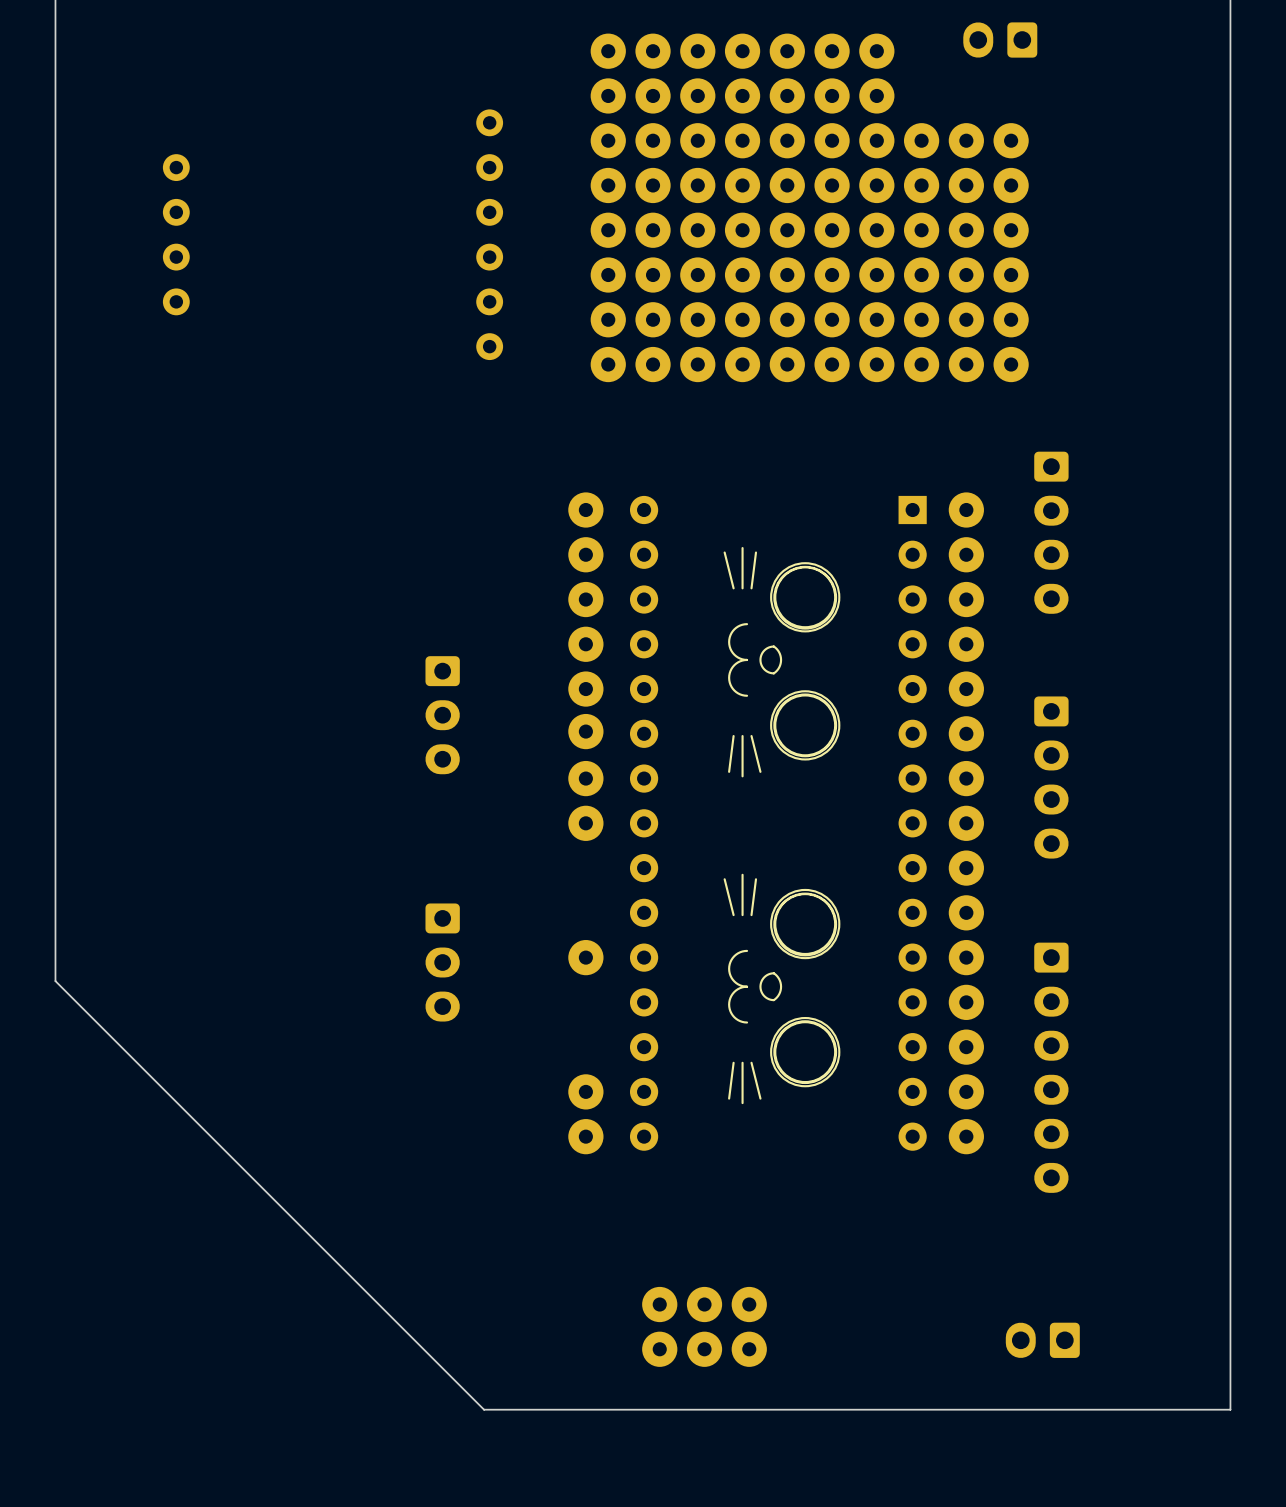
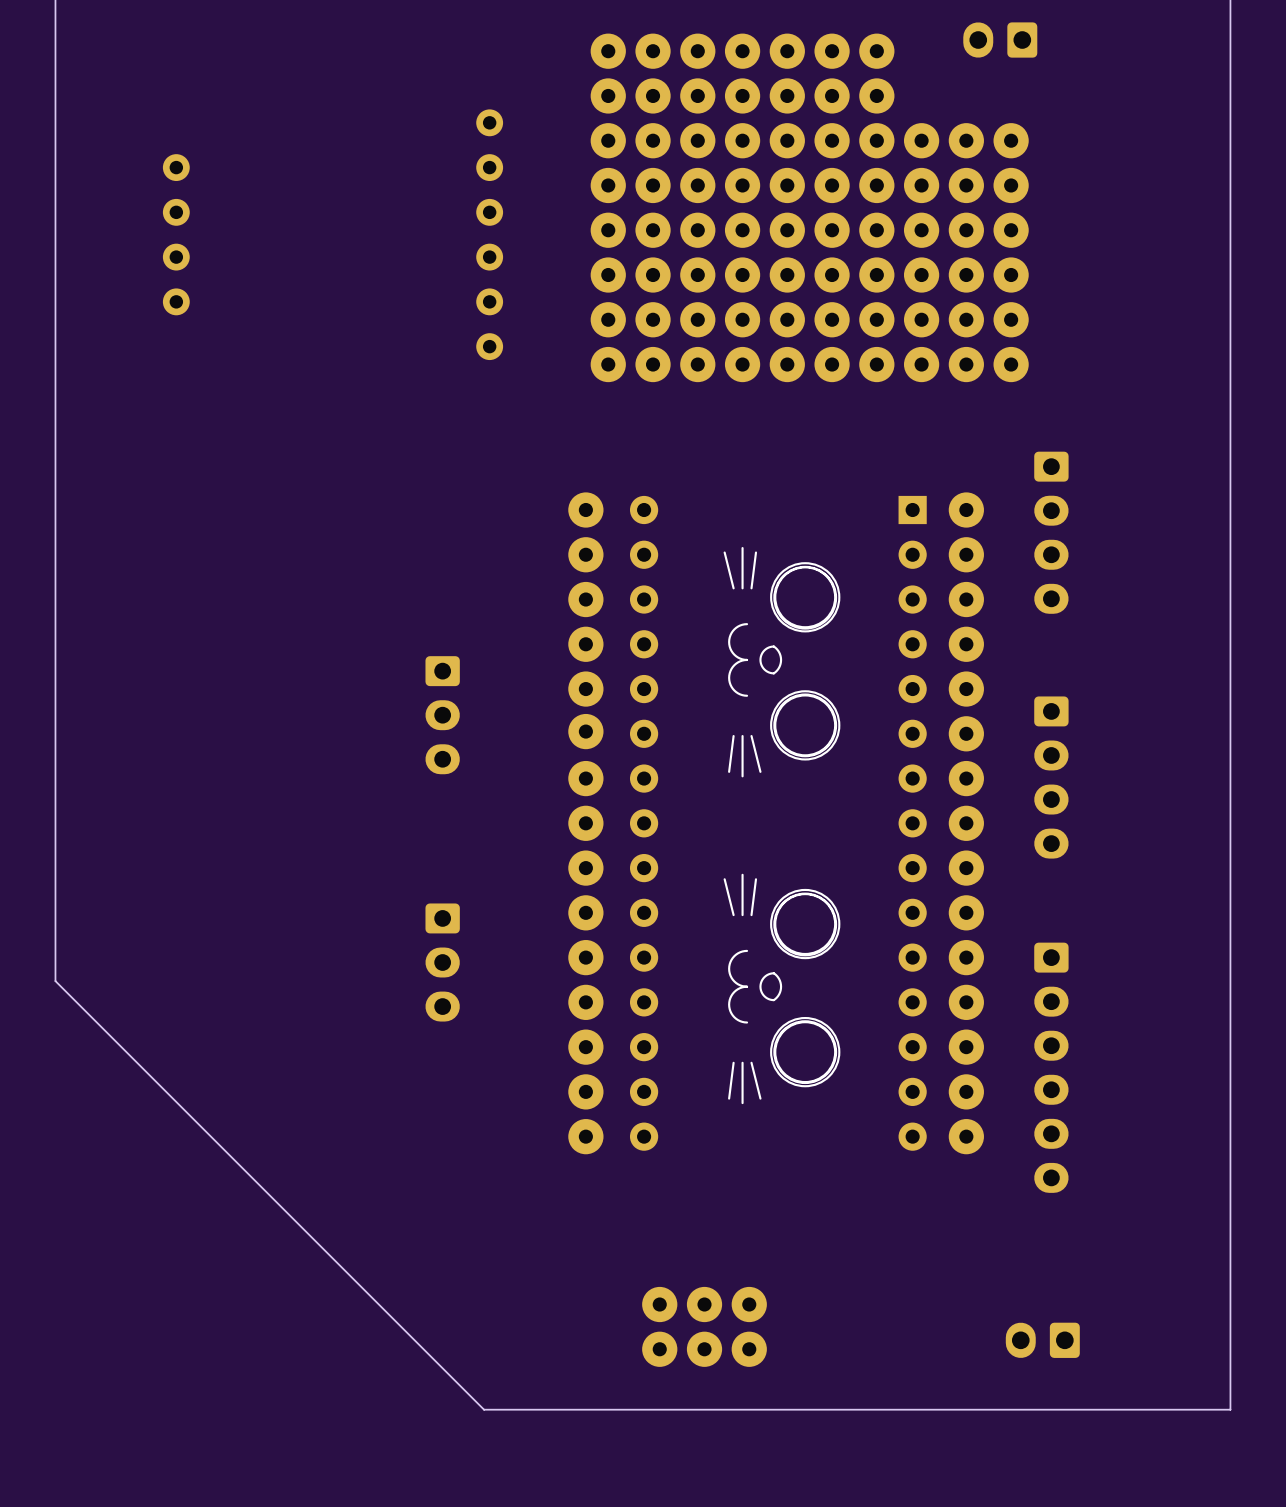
part: none -> (585, 868)
part: none -> (585, 912)
part: none -> (585, 1002)
part: none -> (585, 1047)

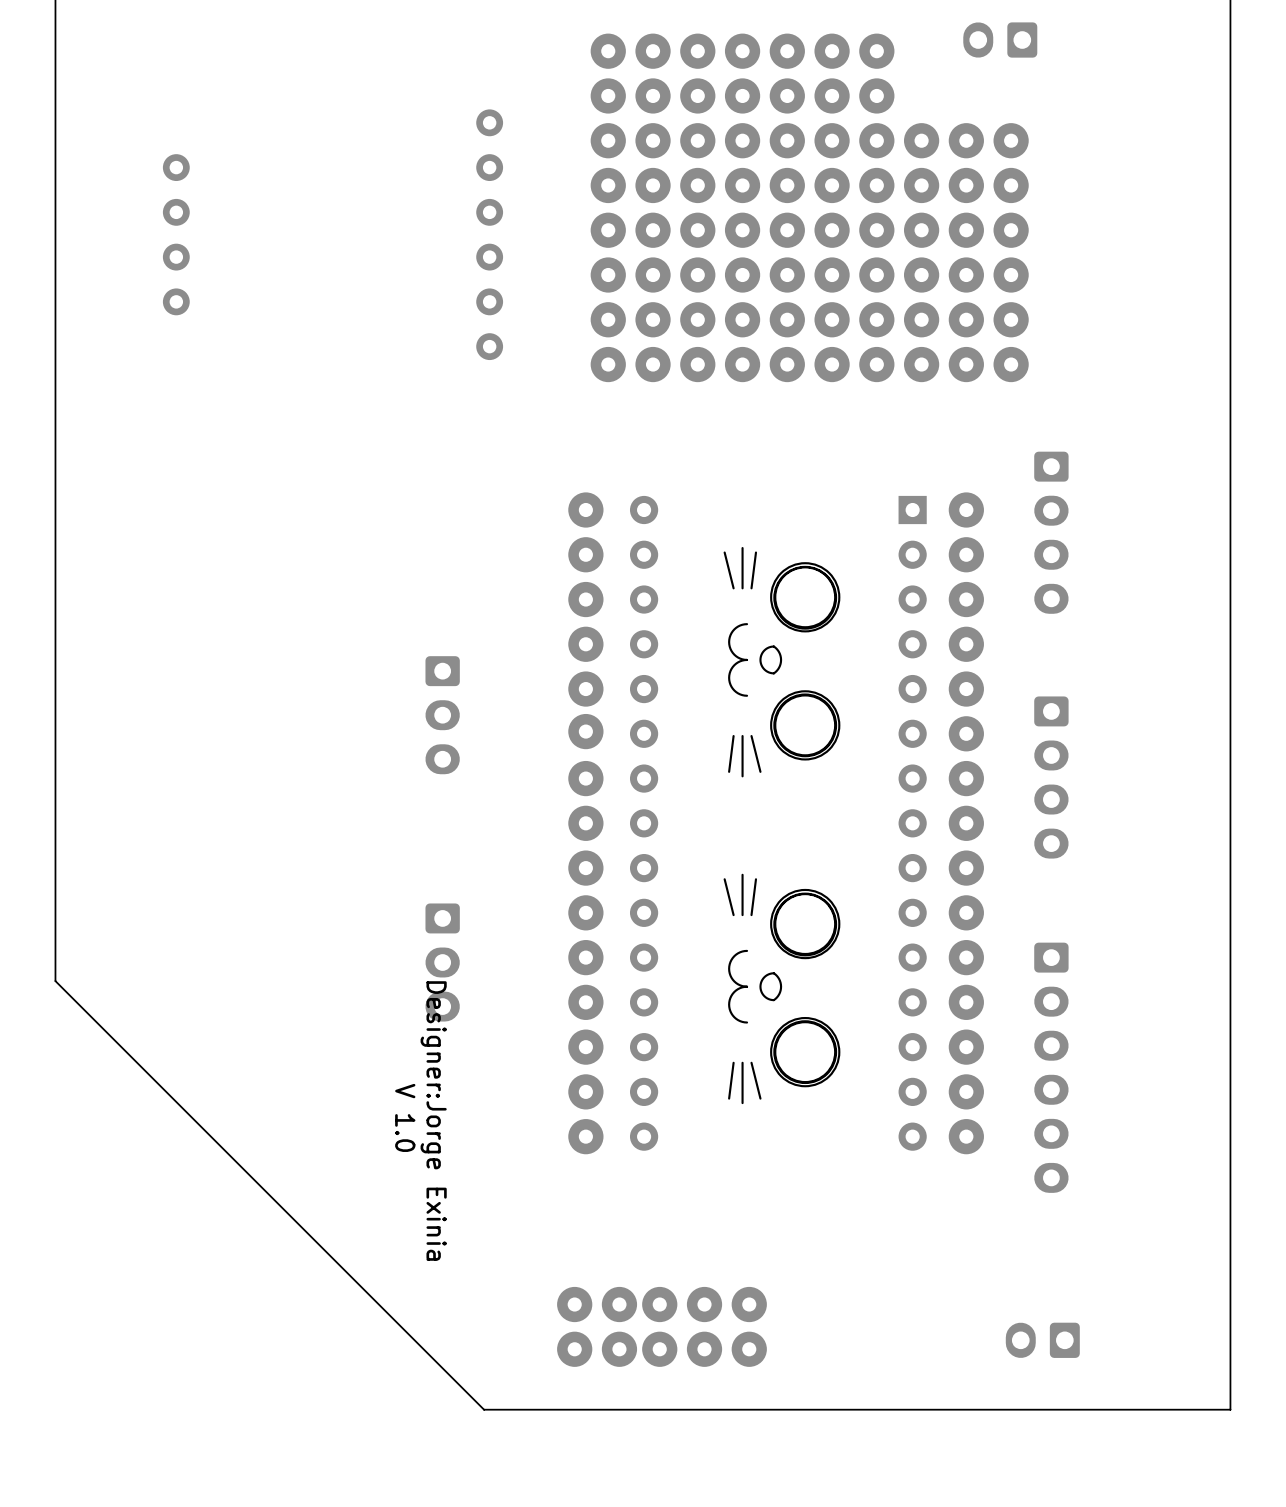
text: none -> V 1.0 (405, 1117)
text: none -> Designer:Jorge Exinia (433, 1120)
part: none -> (574, 1304)
part: none -> (619, 1304)
part: none -> (574, 1349)
part: none -> (619, 1349)

